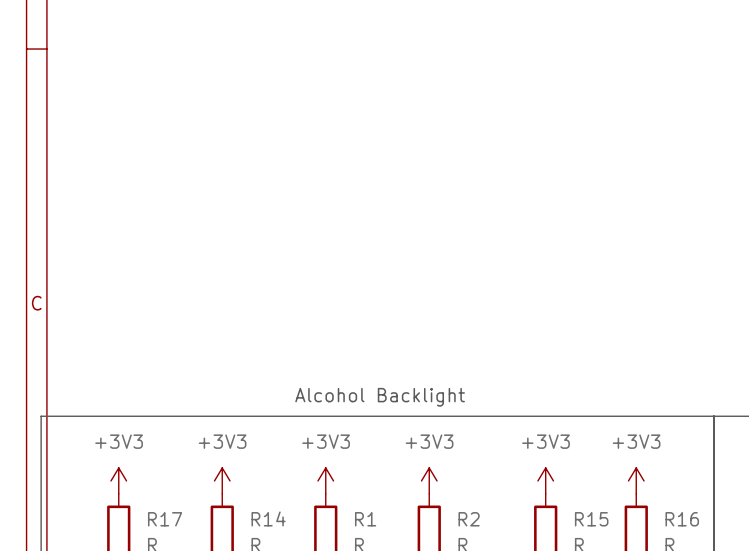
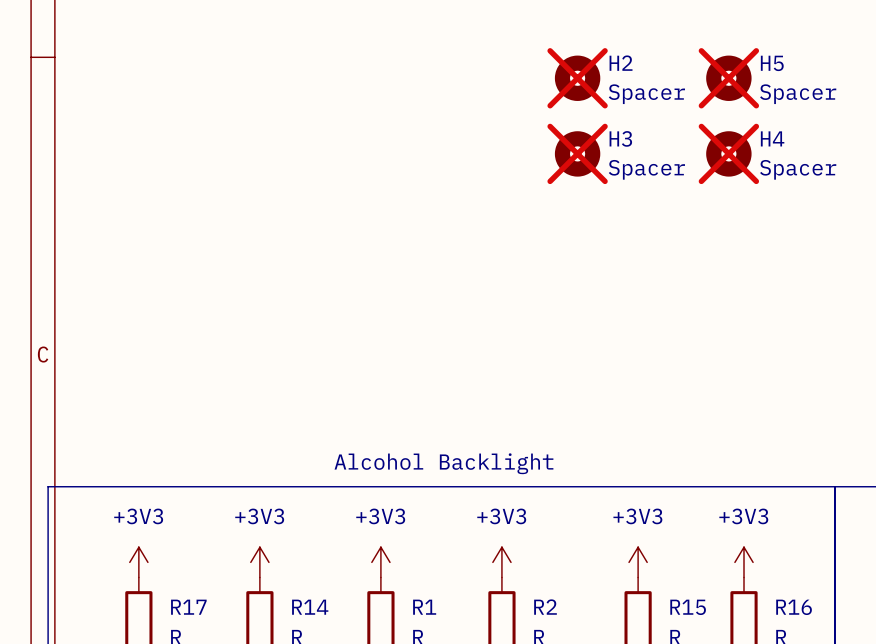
H2: none -> Spacer (577, 78)
H5: none -> Spacer (728, 78)
H3: none -> Spacer (577, 153)
H4: none -> Spacer (728, 153)

